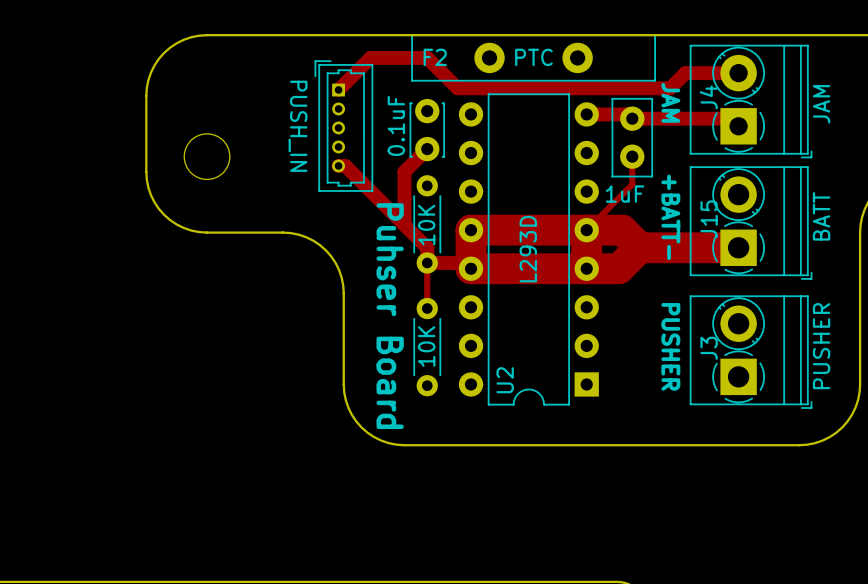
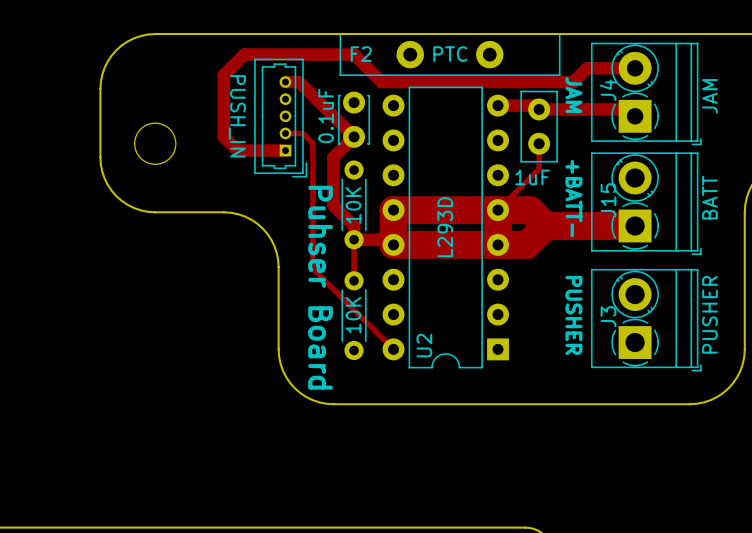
track: (370, 57) (338, 89) -> (302, 54) (244, 54) (223, 75) (223, 136) (237, 150) (285, 150)
track: none -> (285, 82) (299, 82) (354, 136)
part rotation: 0° (343, 126) -> 180° (280, 118)
track: none -> (285, 133) (302, 133) (312, 143) (312, 268) (393, 349)
track: (338, 165) (345, 165) (404, 225) -> none

